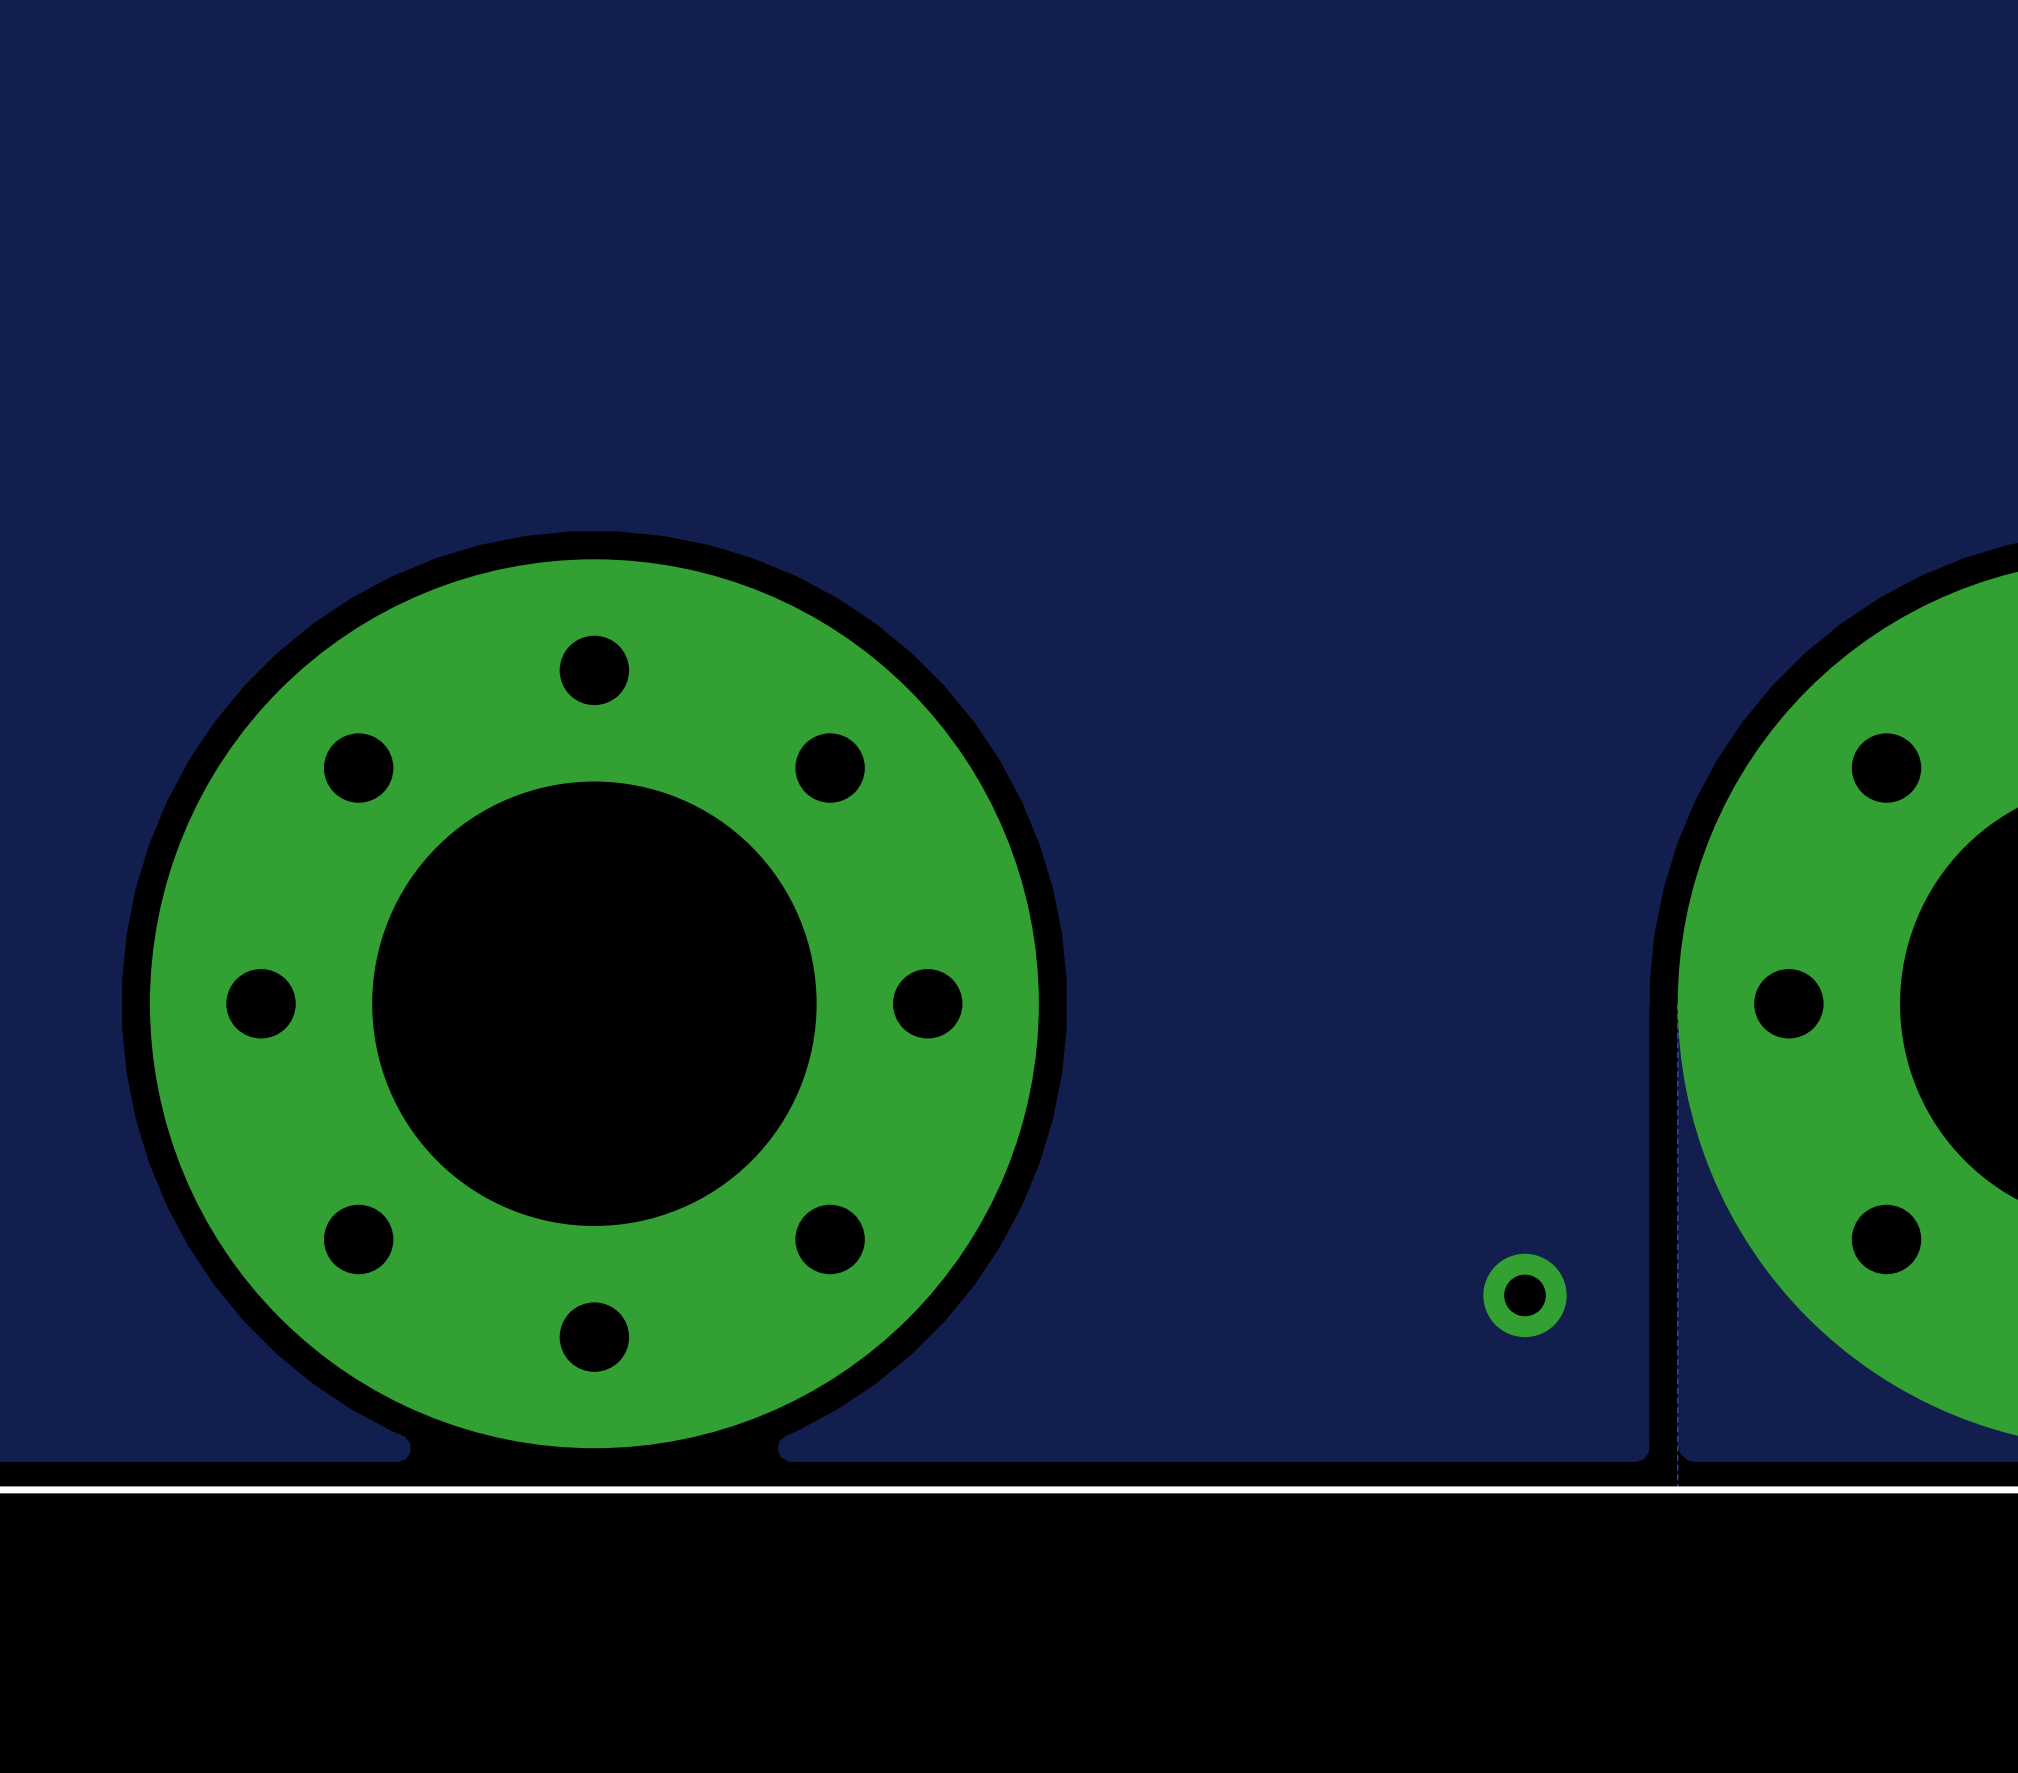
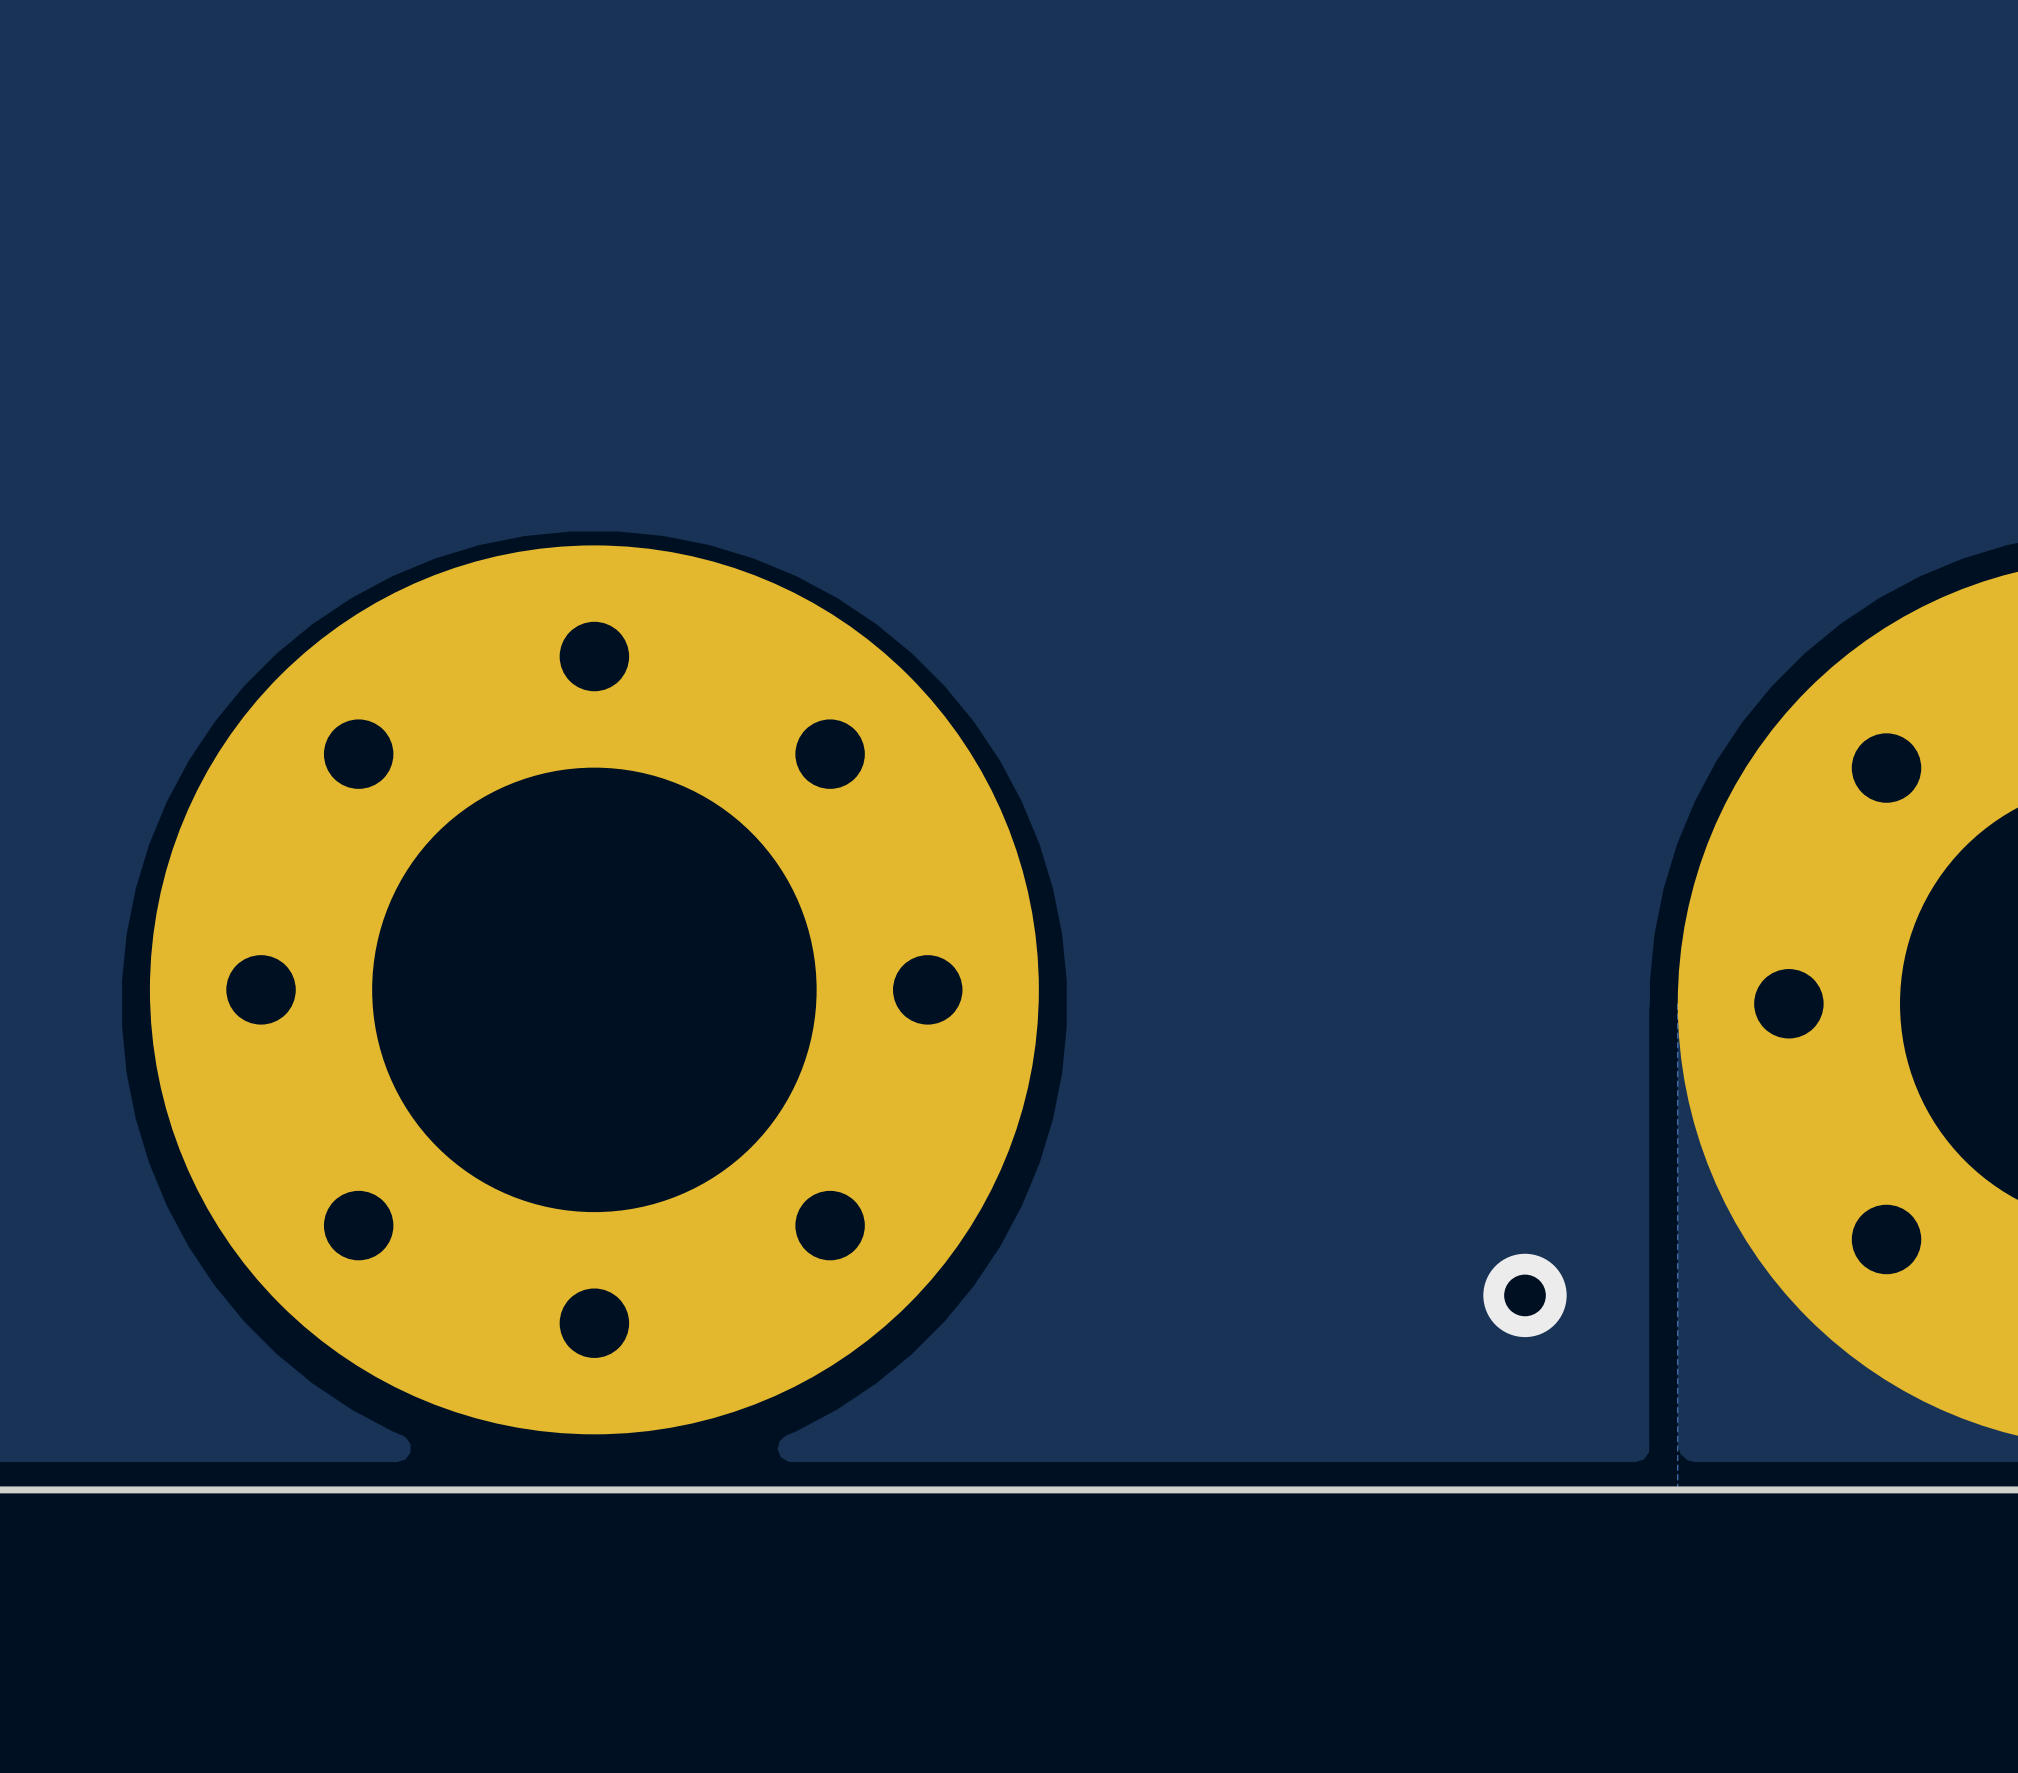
part position: (594, 1003) -> (594, 989)

